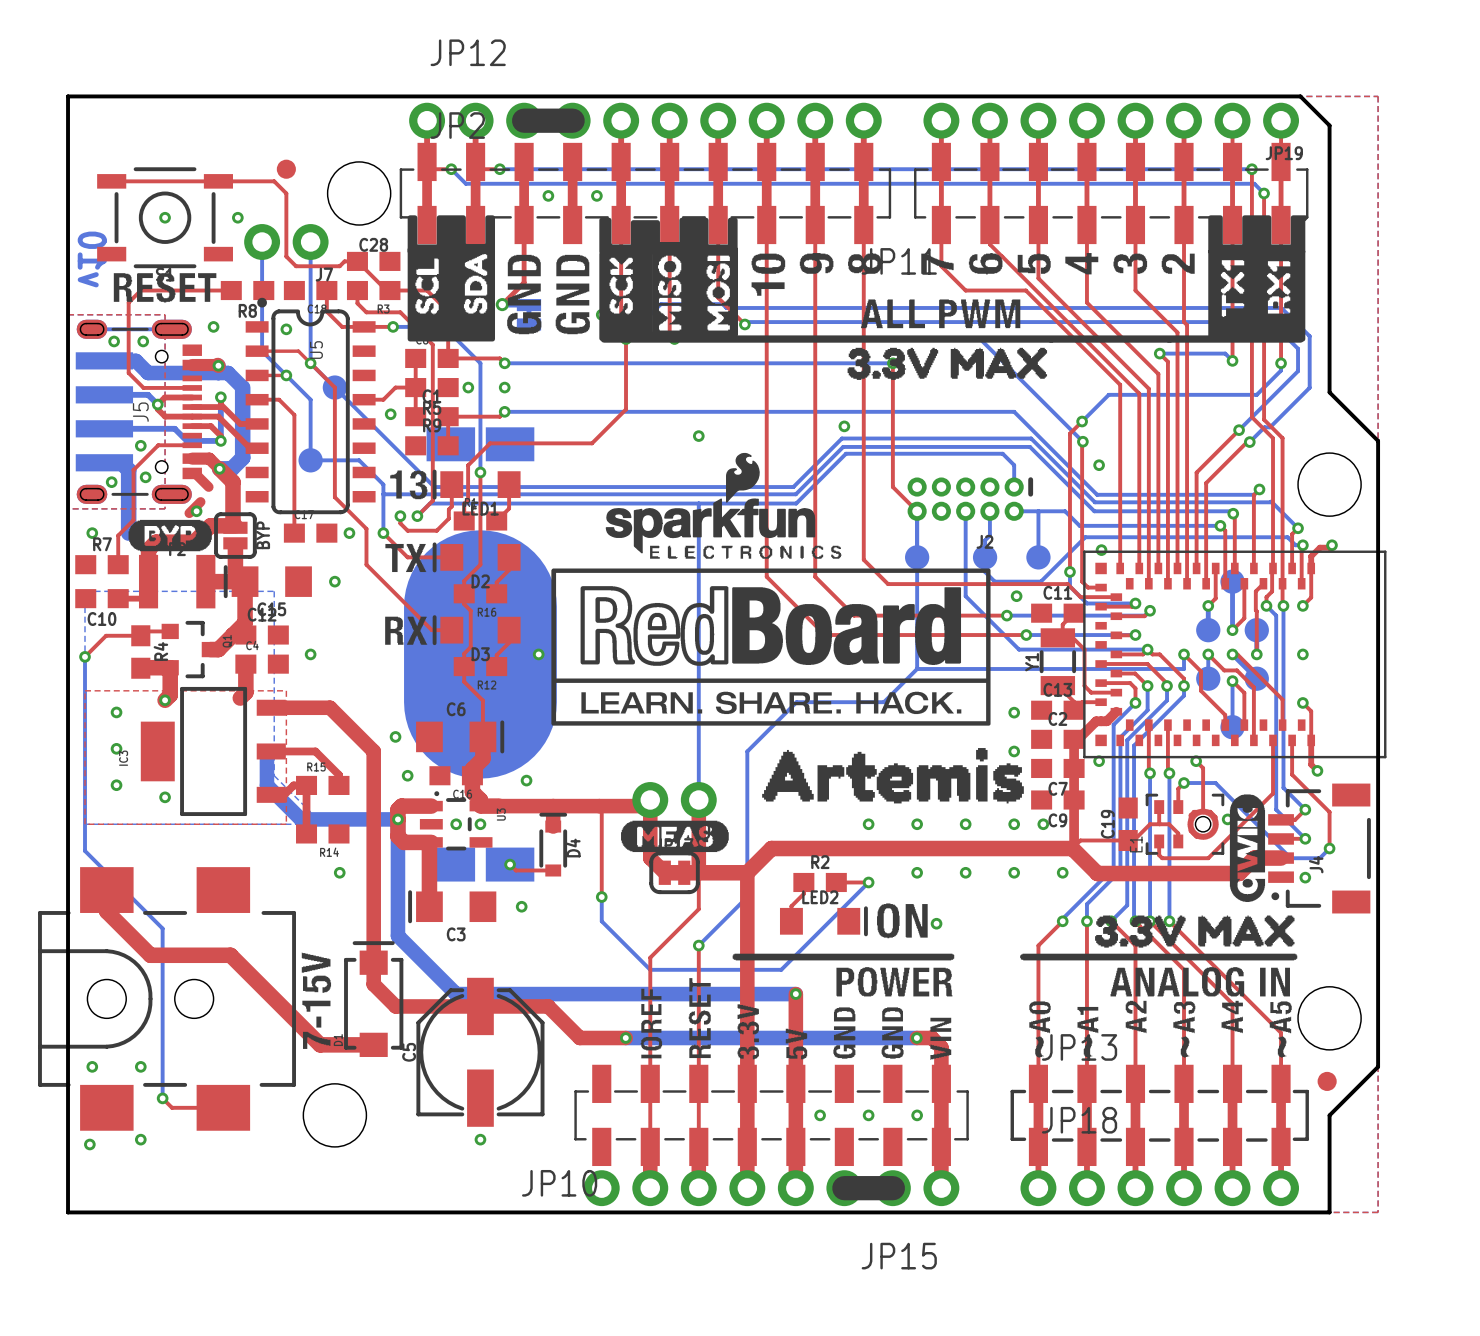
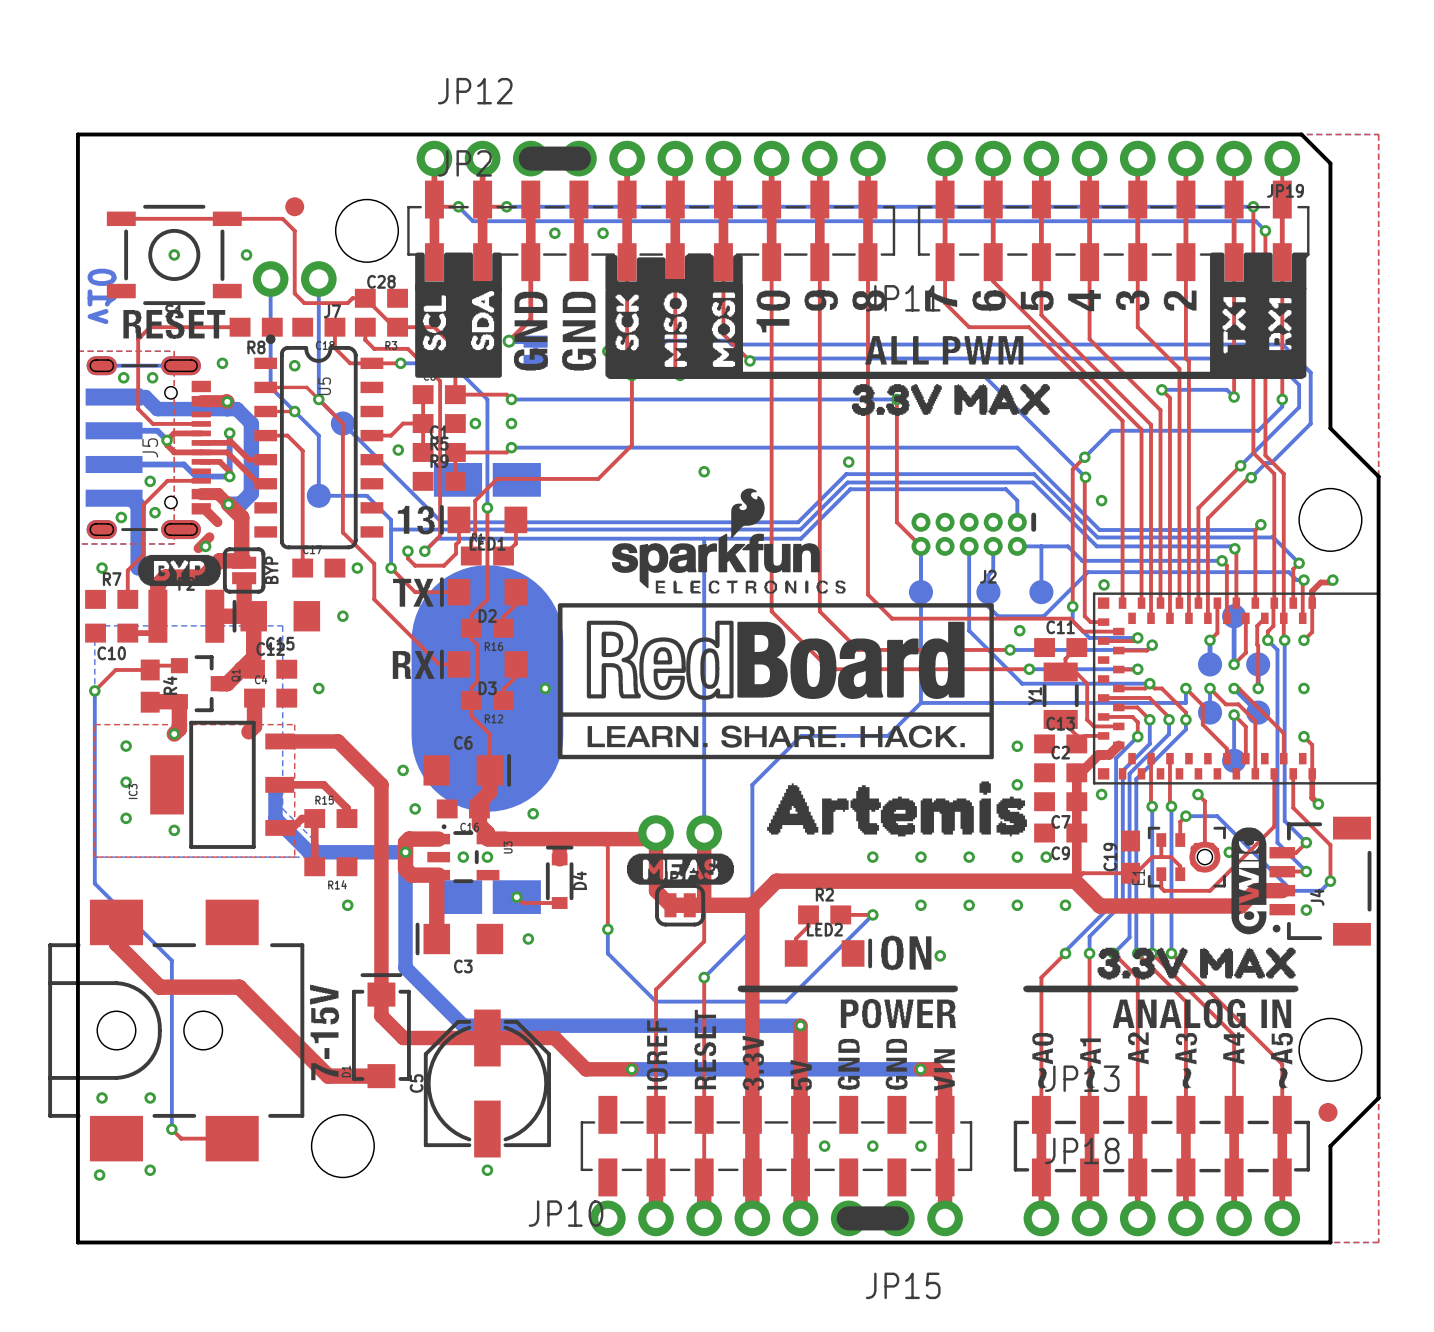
part footprint: [1083, 550, 1387, 759] -> [1092, 592, 1380, 785]

